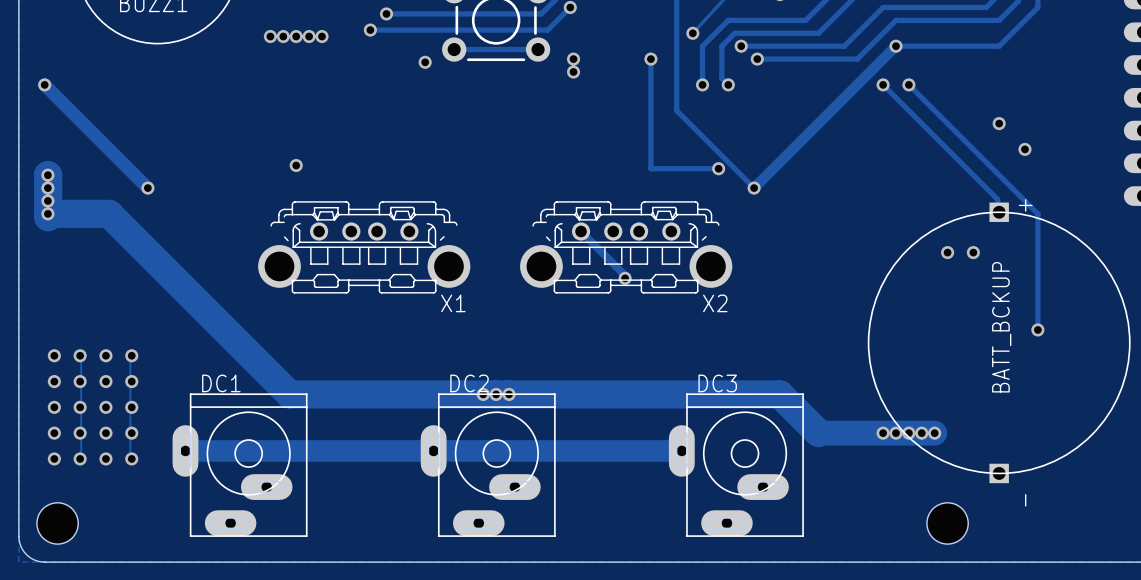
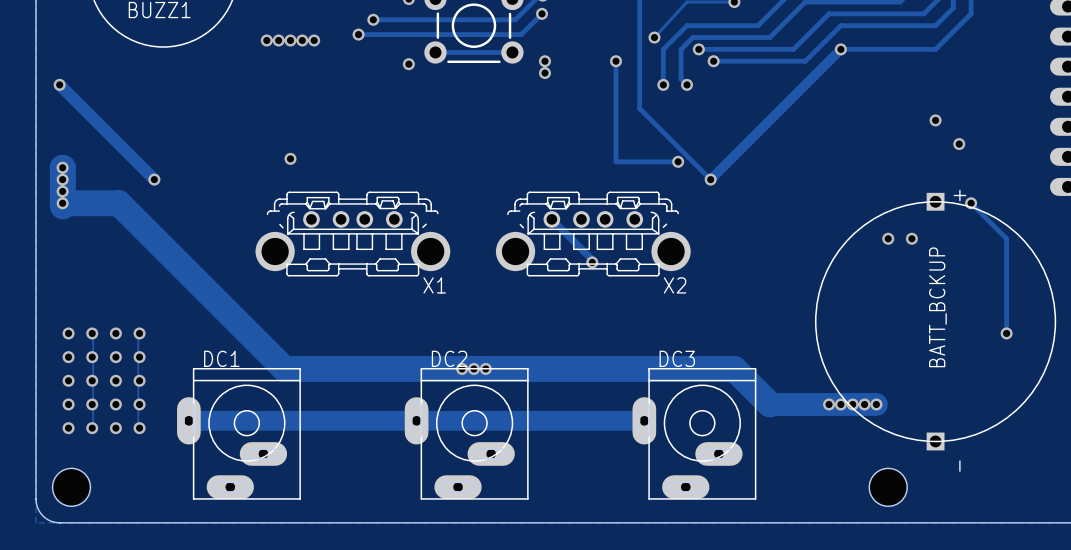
track: (883, 84) (997, 199) (999, 212) -> none
via: (883, 84) -> none
track: (908, 84) (1037, 213) (1037, 329) -> none
via: (908, 84) -> none
track: none -> (971, 203) (1006, 238) (1006, 333)
via: none -> (971, 203)
via position: (1037, 329) -> (1006, 333)

